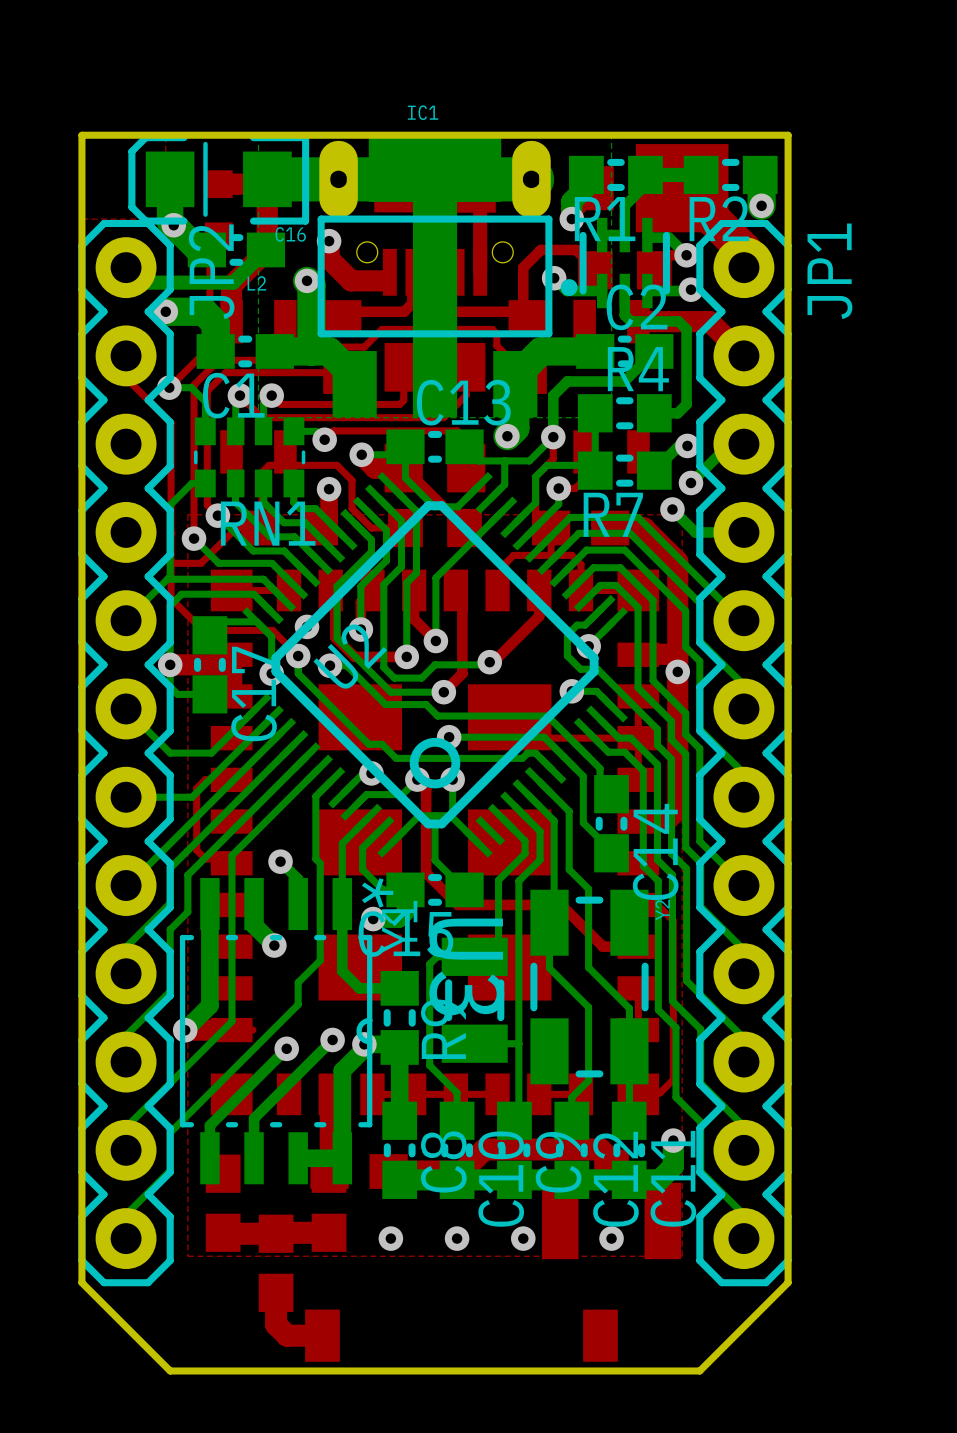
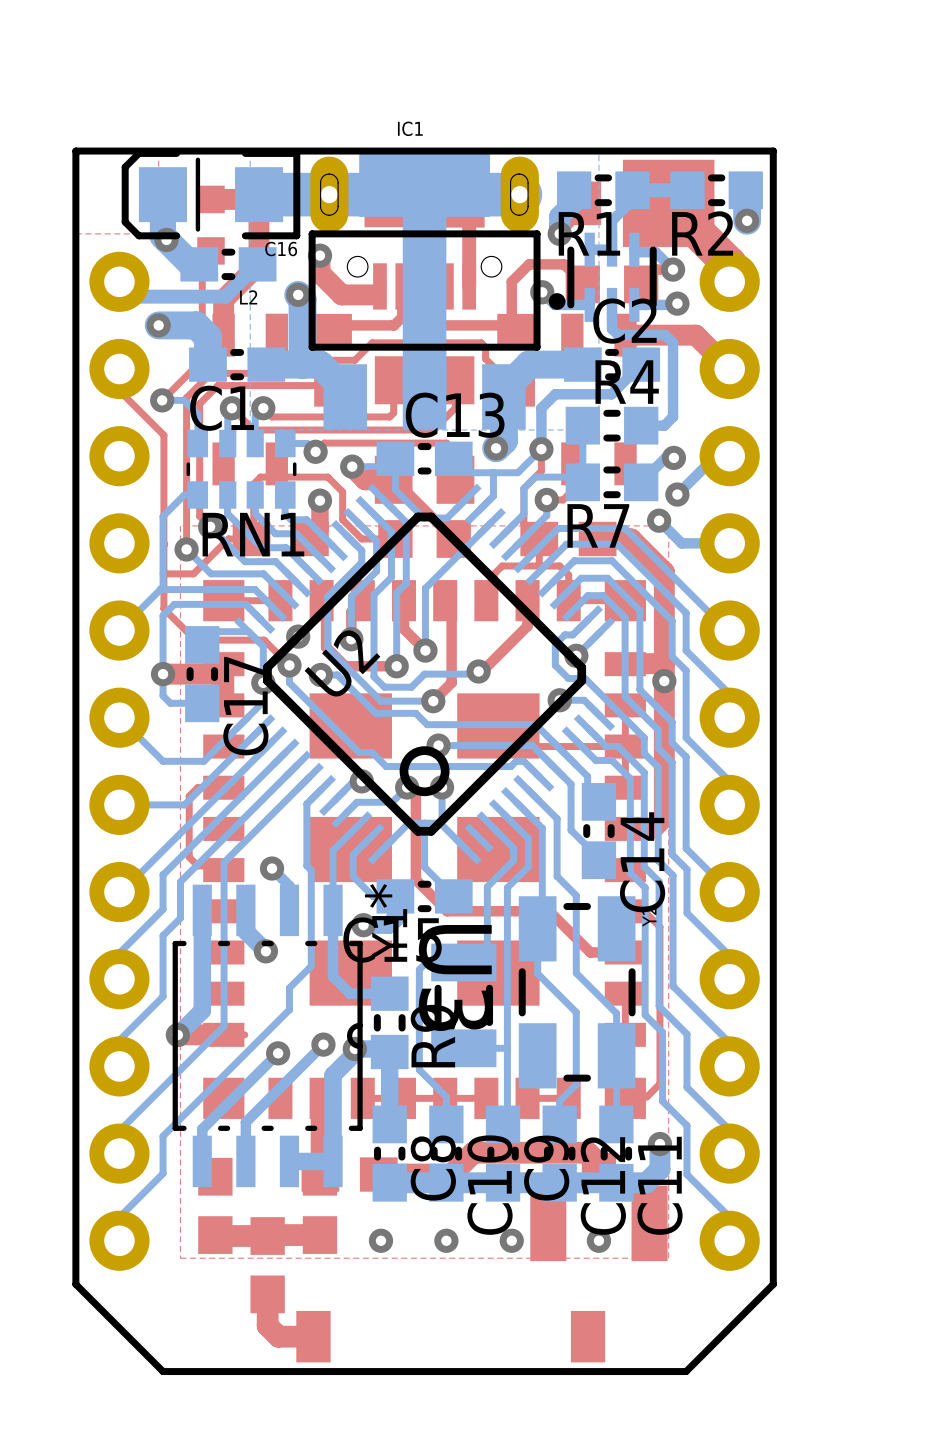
JP2 side: bottom (126, 753) -> top (119, 761)
JP1 side: bottom (743, 753) -> top (729, 761)

